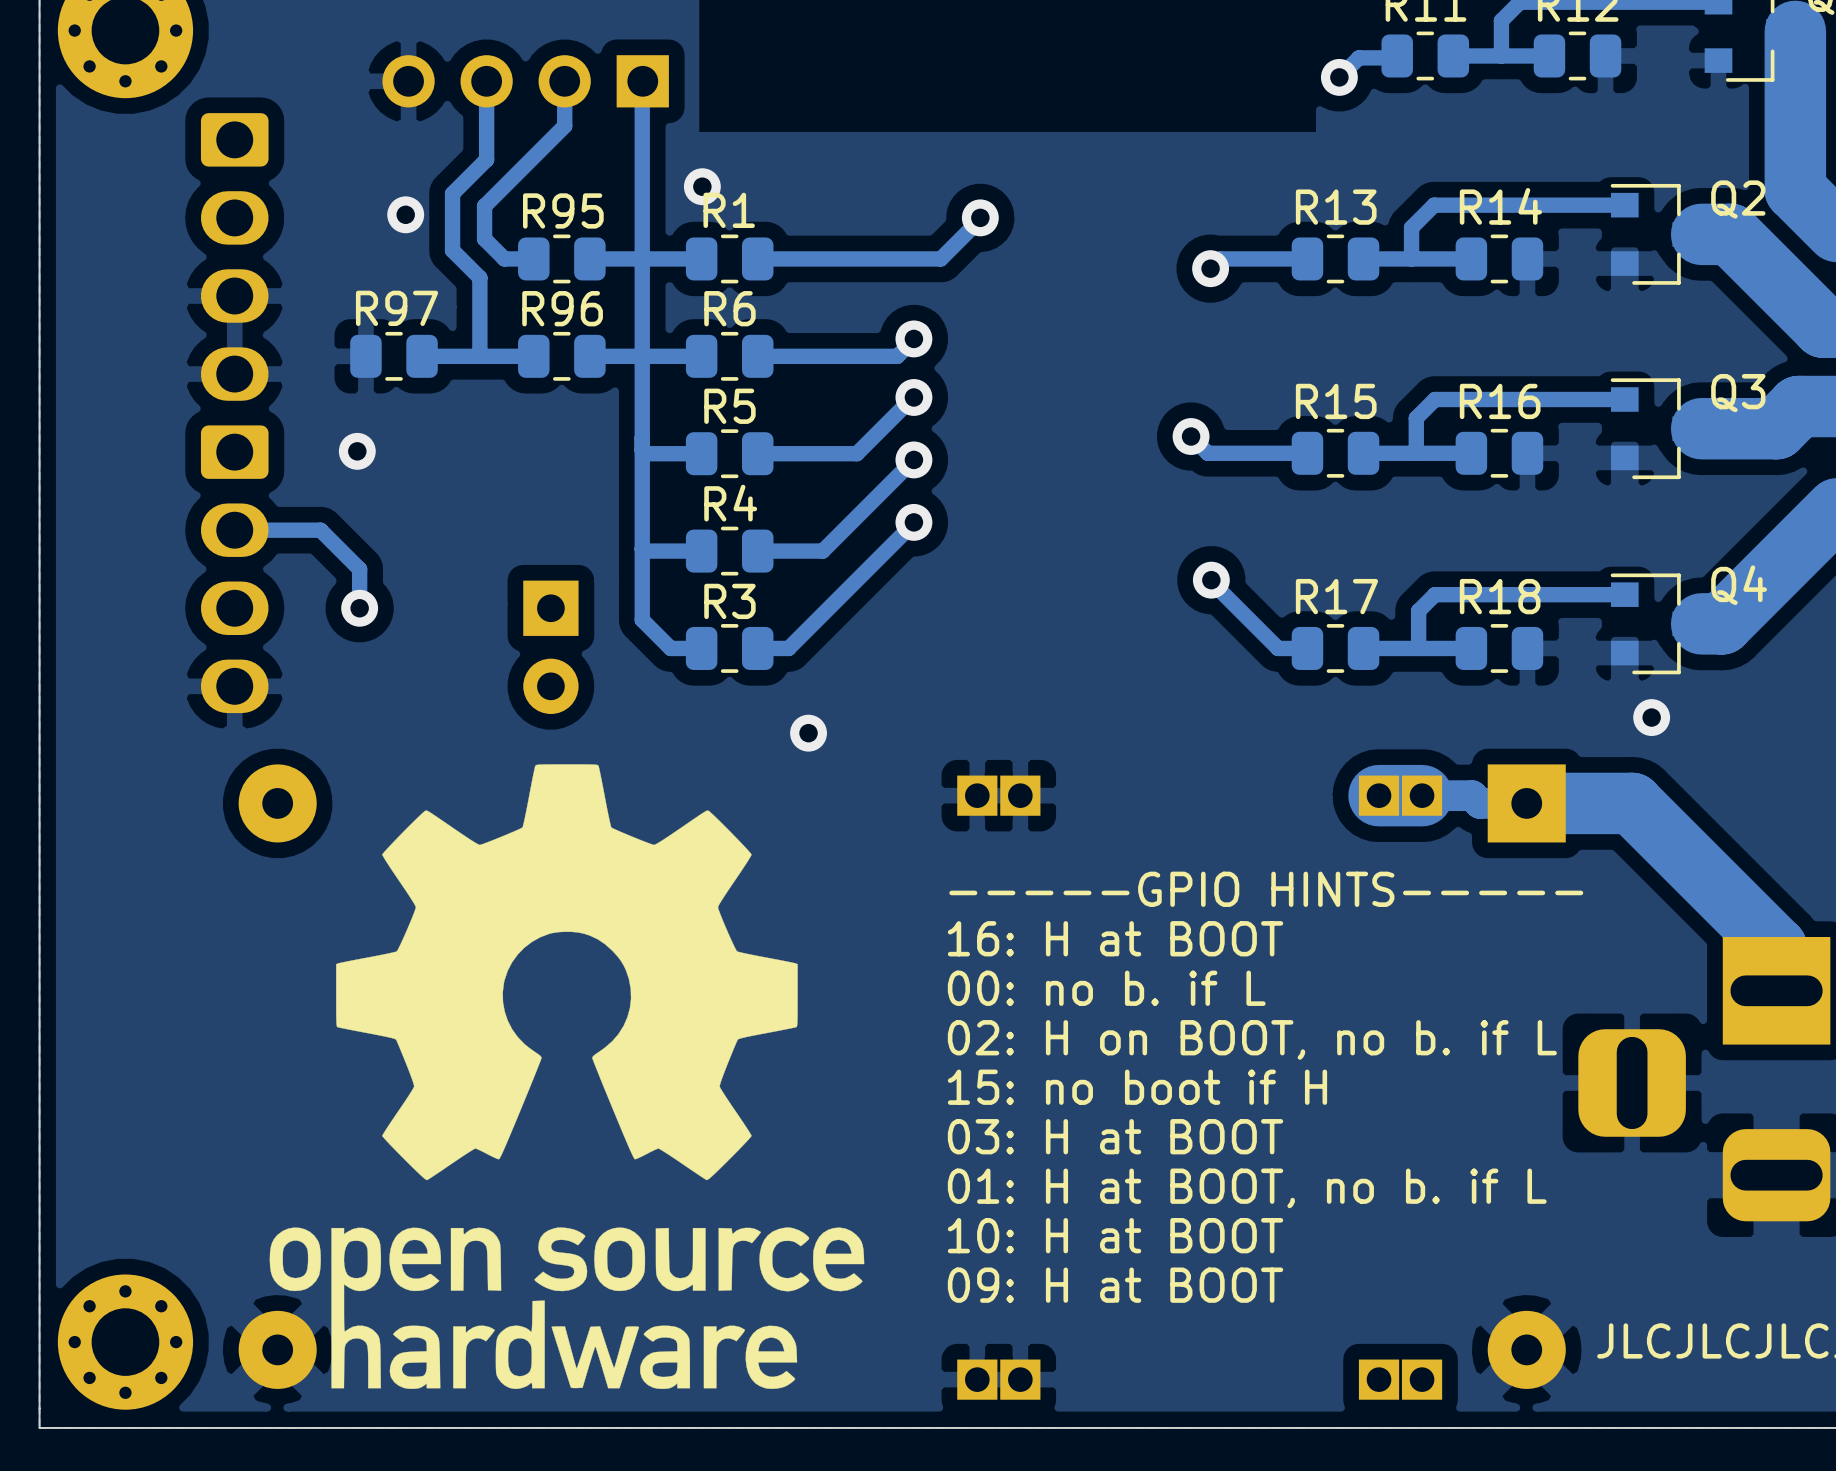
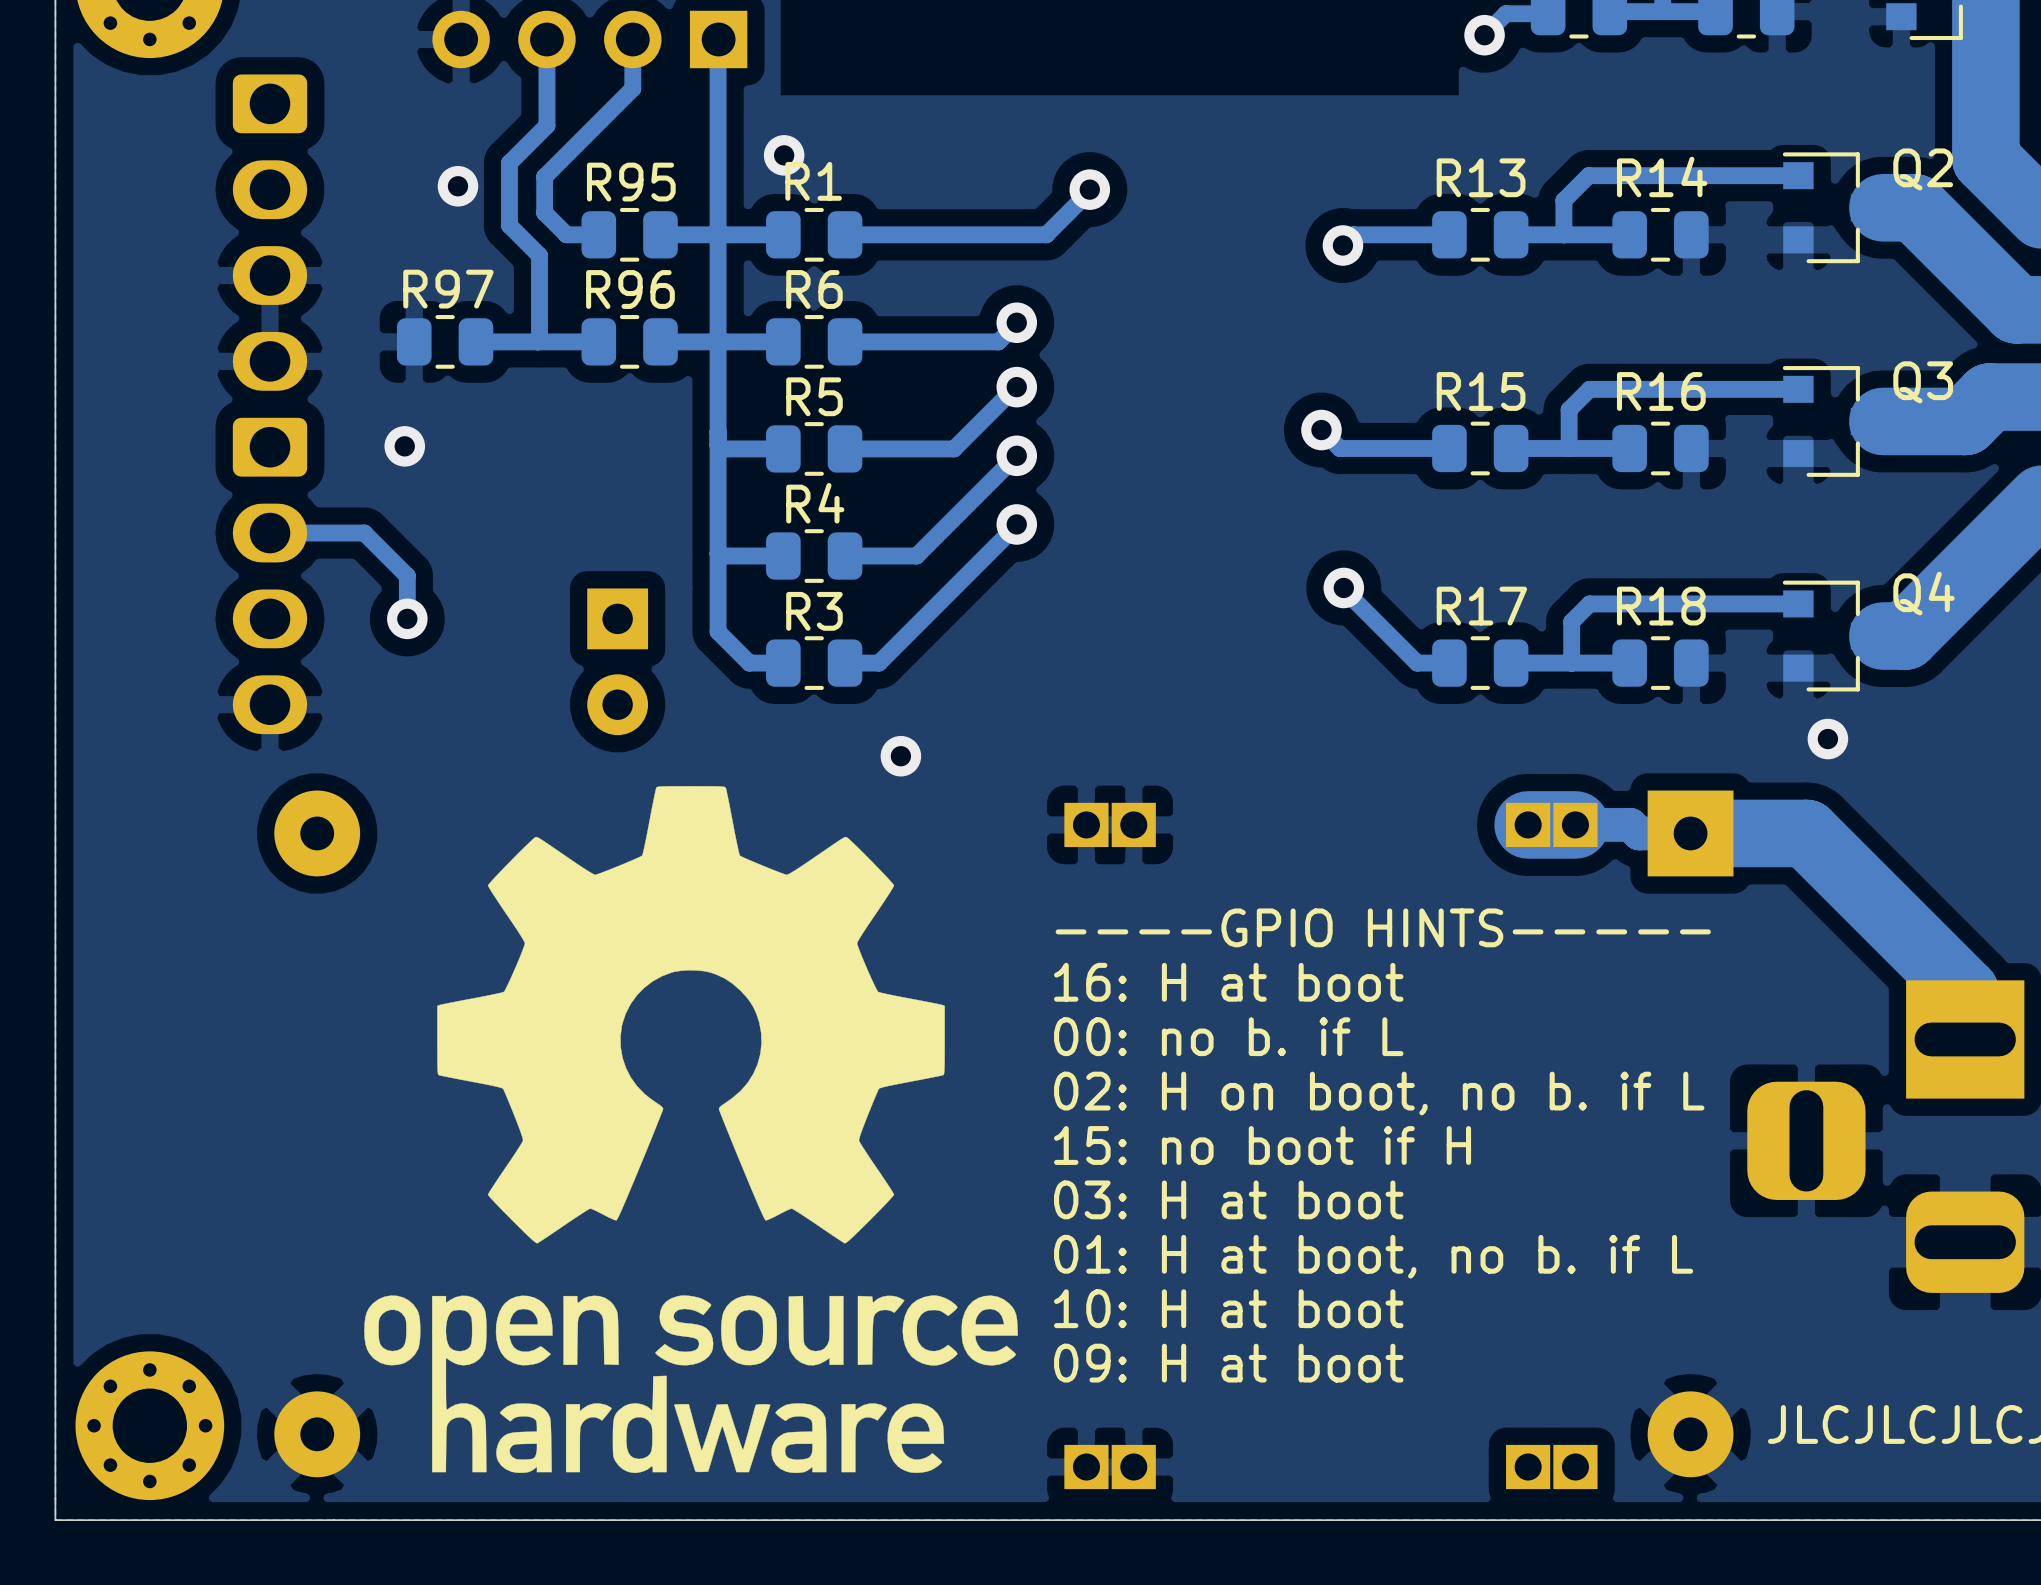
text: -----GPIO HINTS----- (1266, 889) -> ----GPIO HINTS----- (1383, 927)
text: 16: H at BOOT (1115, 938) -> 16: H at boot (1228, 982)
text: 02: H on BOOT, no b. if L (1252, 1039) -> 02: H on boot, no b. if L (1379, 1093)
drawing position: (567, 1076) -> (691, 1129)
text: 03: H at BOOT (1115, 1136) -> 03: H at boot (1228, 1199)
text: 01: H at BOOT, no b. if L (1247, 1188) -> 01: H at boot, no b. if L (1373, 1256)
text: 10: H at BOOT (1115, 1235) -> 10: H at boot (1228, 1308)
text: 09: H at BOOT (1115, 1285) -> 09: H at boot (1228, 1363)

